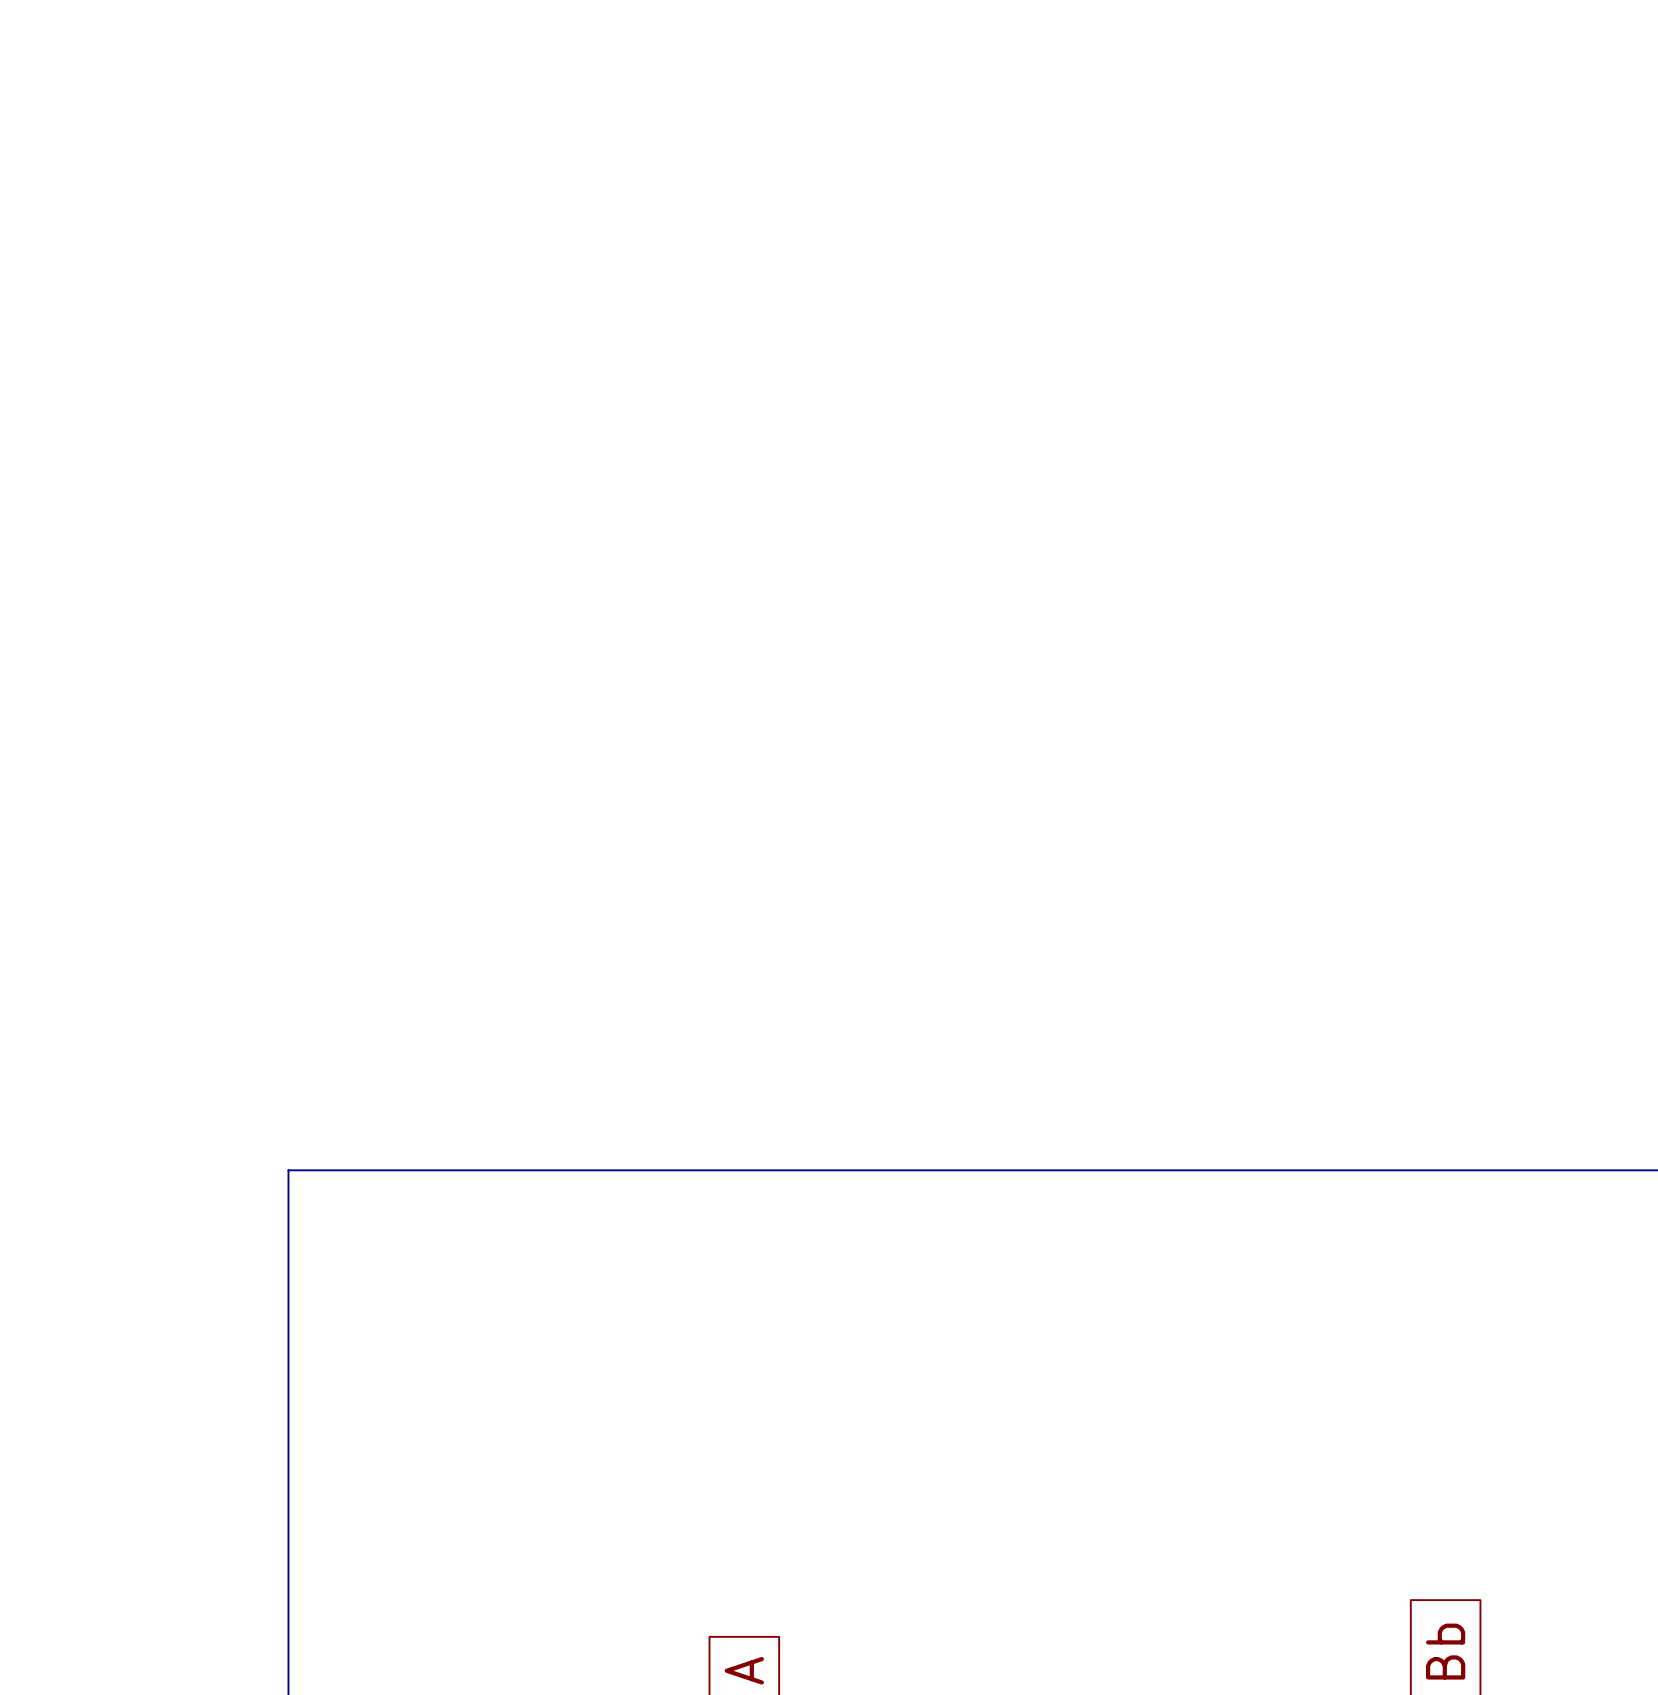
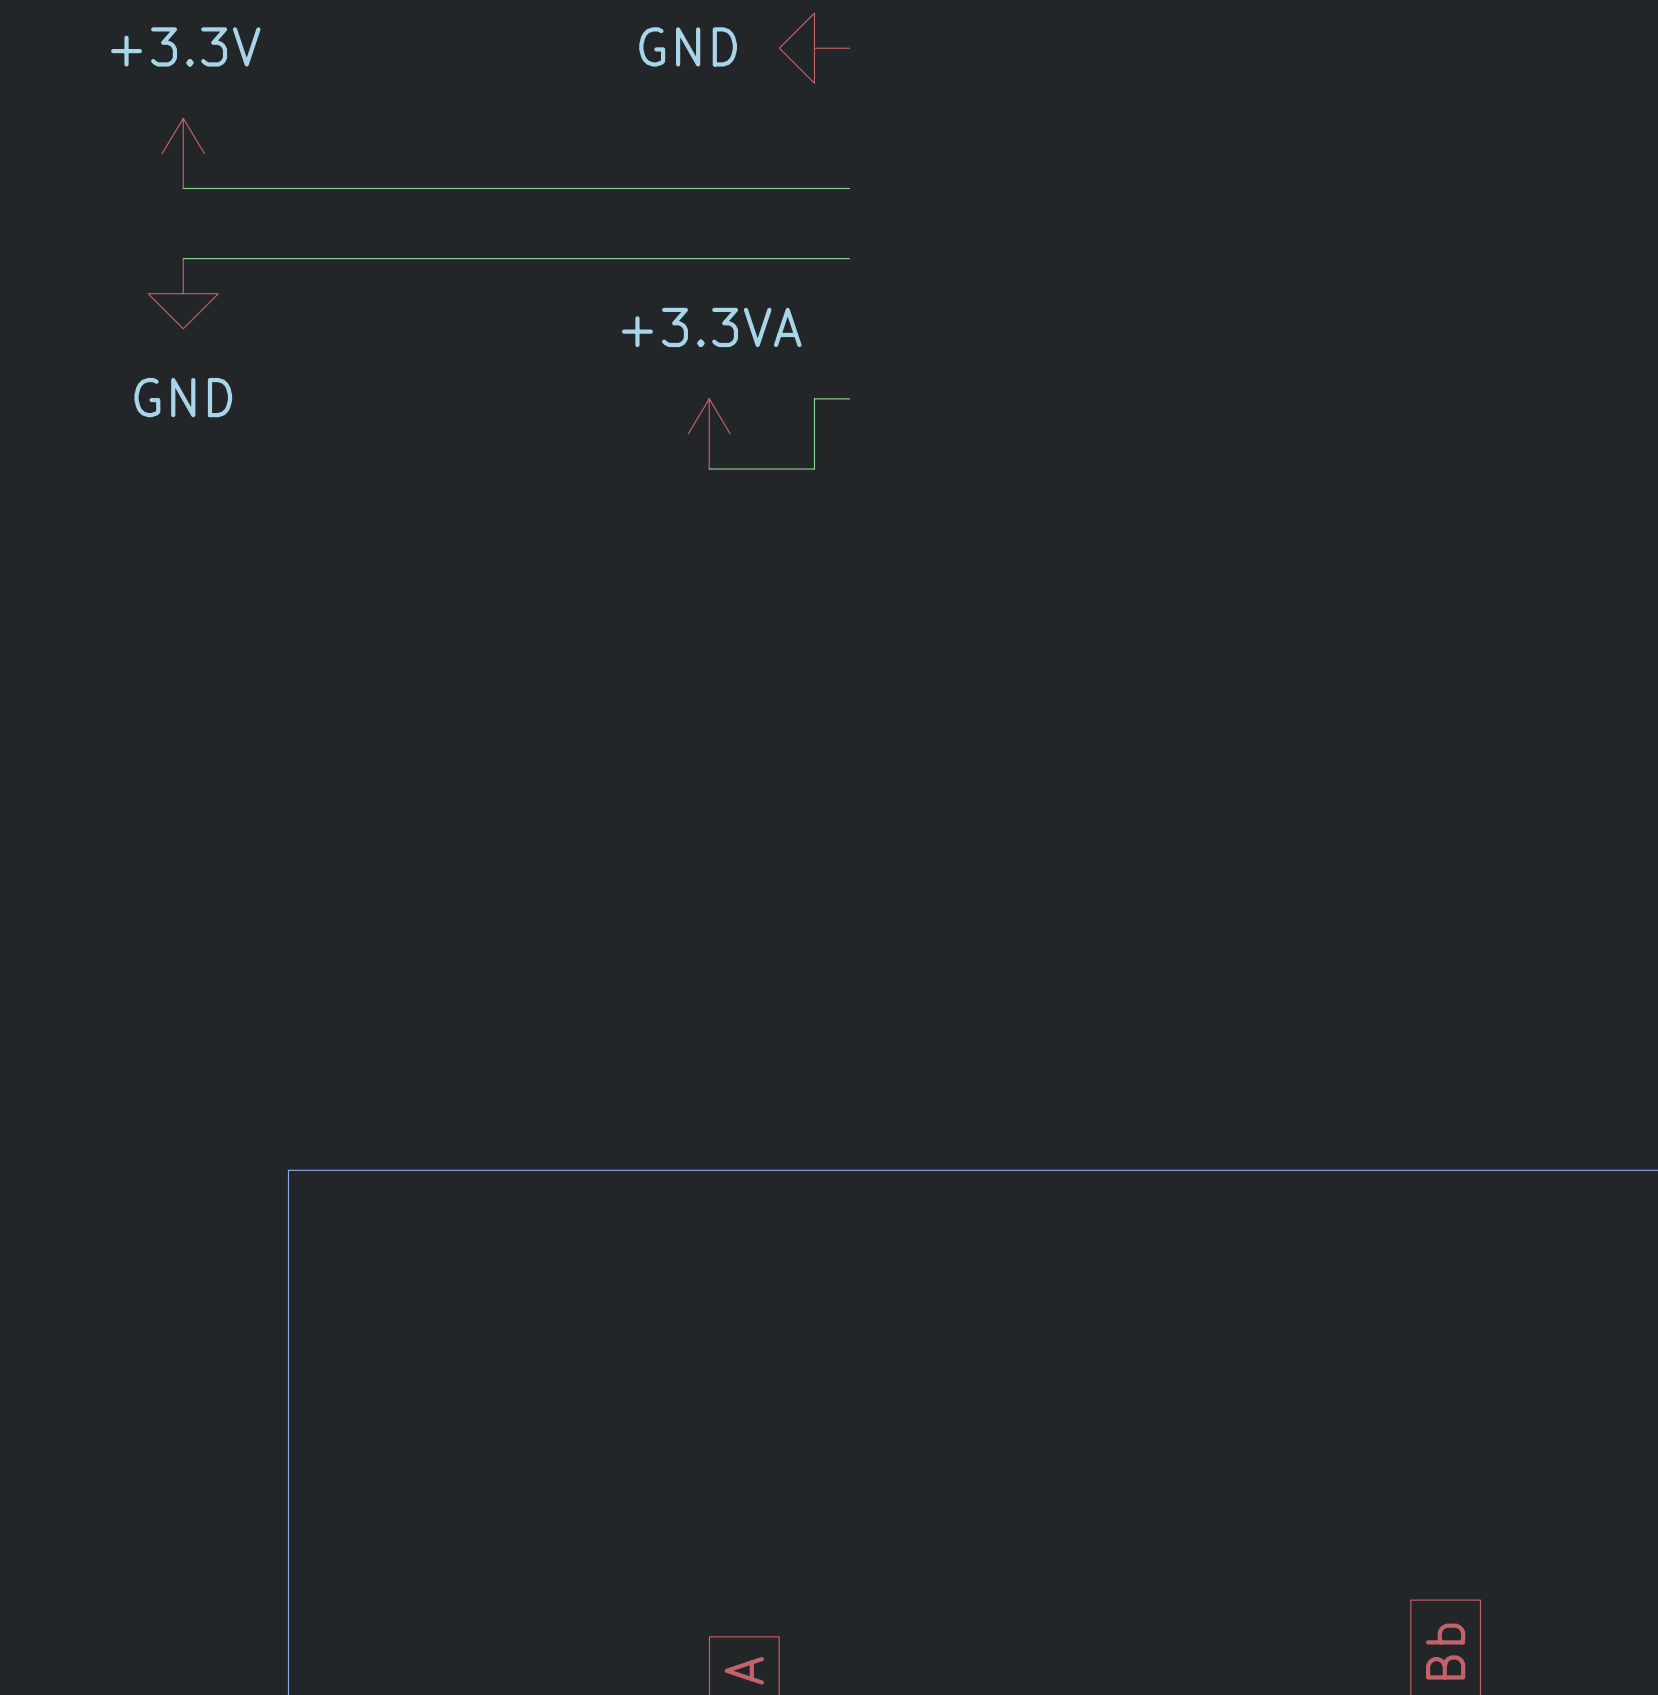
power symbol: none -> GND (814, 48)
power symbol: none -> +3.3V (183, 153)
wire: none -> (183, 188) (849, 188)
wire: none -> (183, 258) (849, 258)
power symbol: none -> GND (183, 293)
wire: none -> (849, 398) (814, 398) (814, 469) (709, 469)
power symbol: none -> +3.3VA (709, 433)

